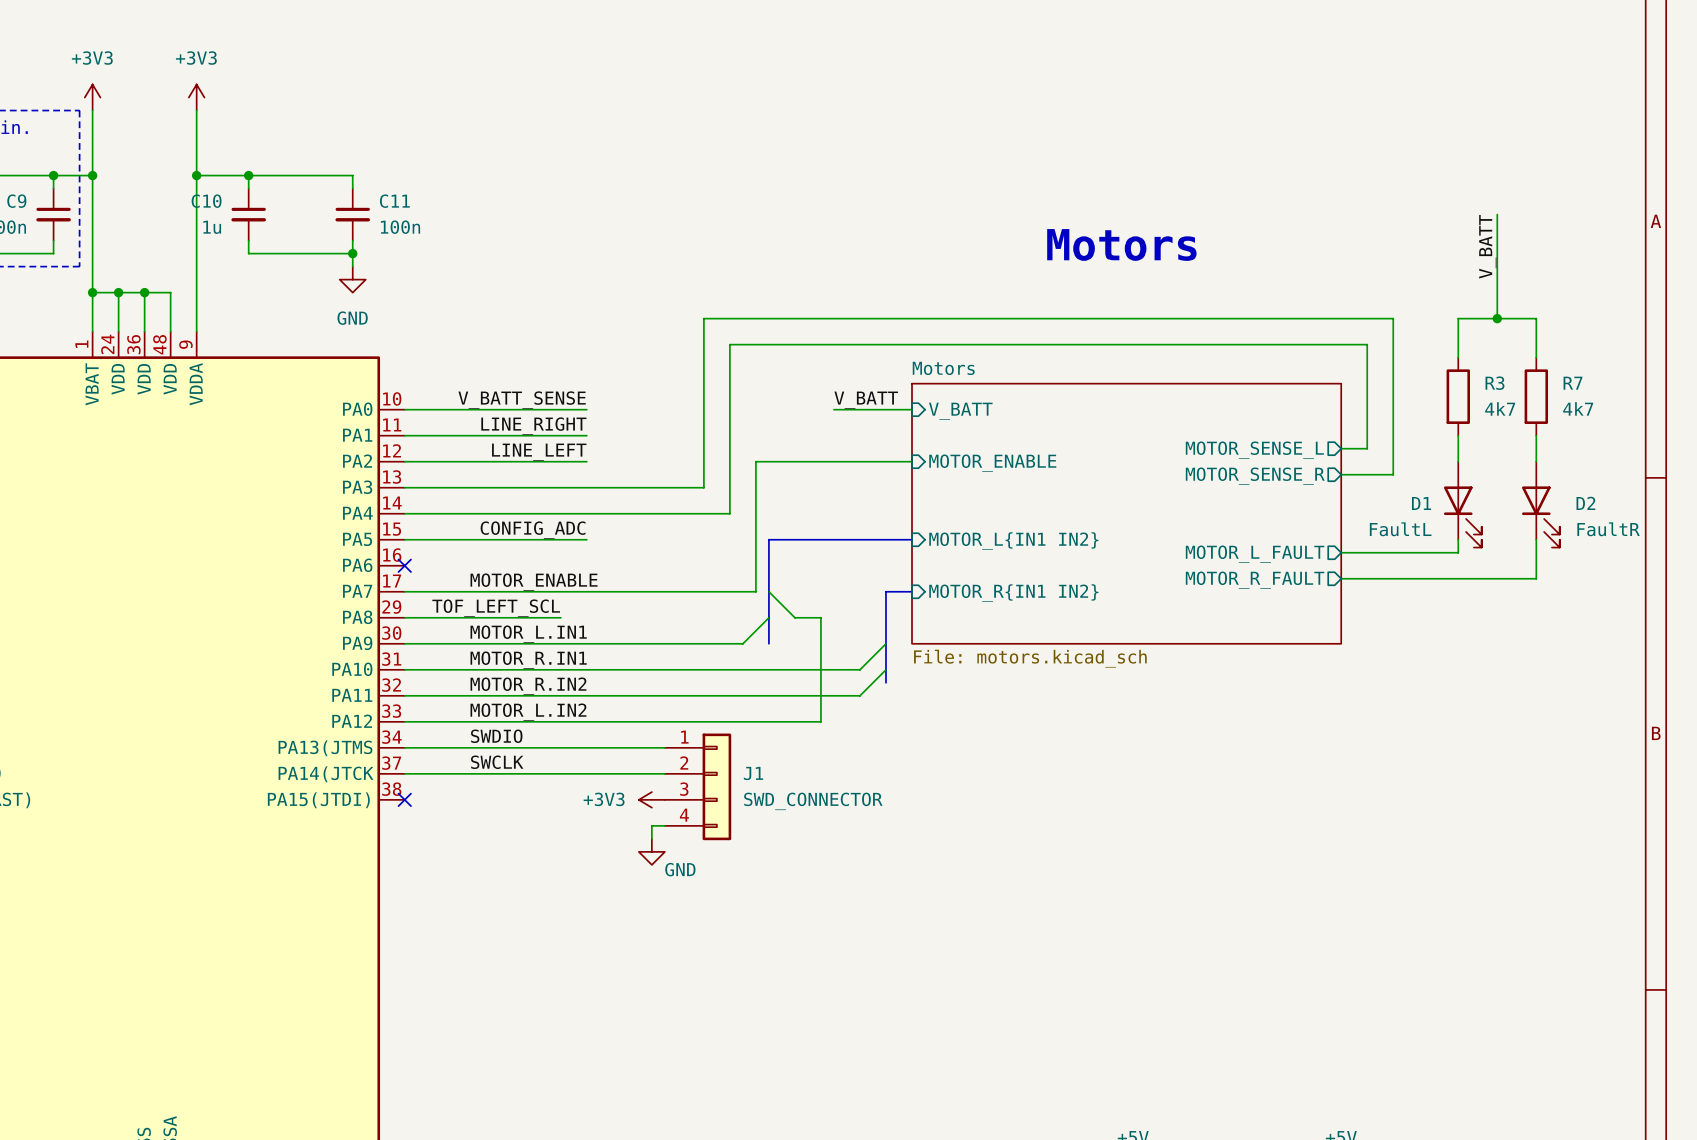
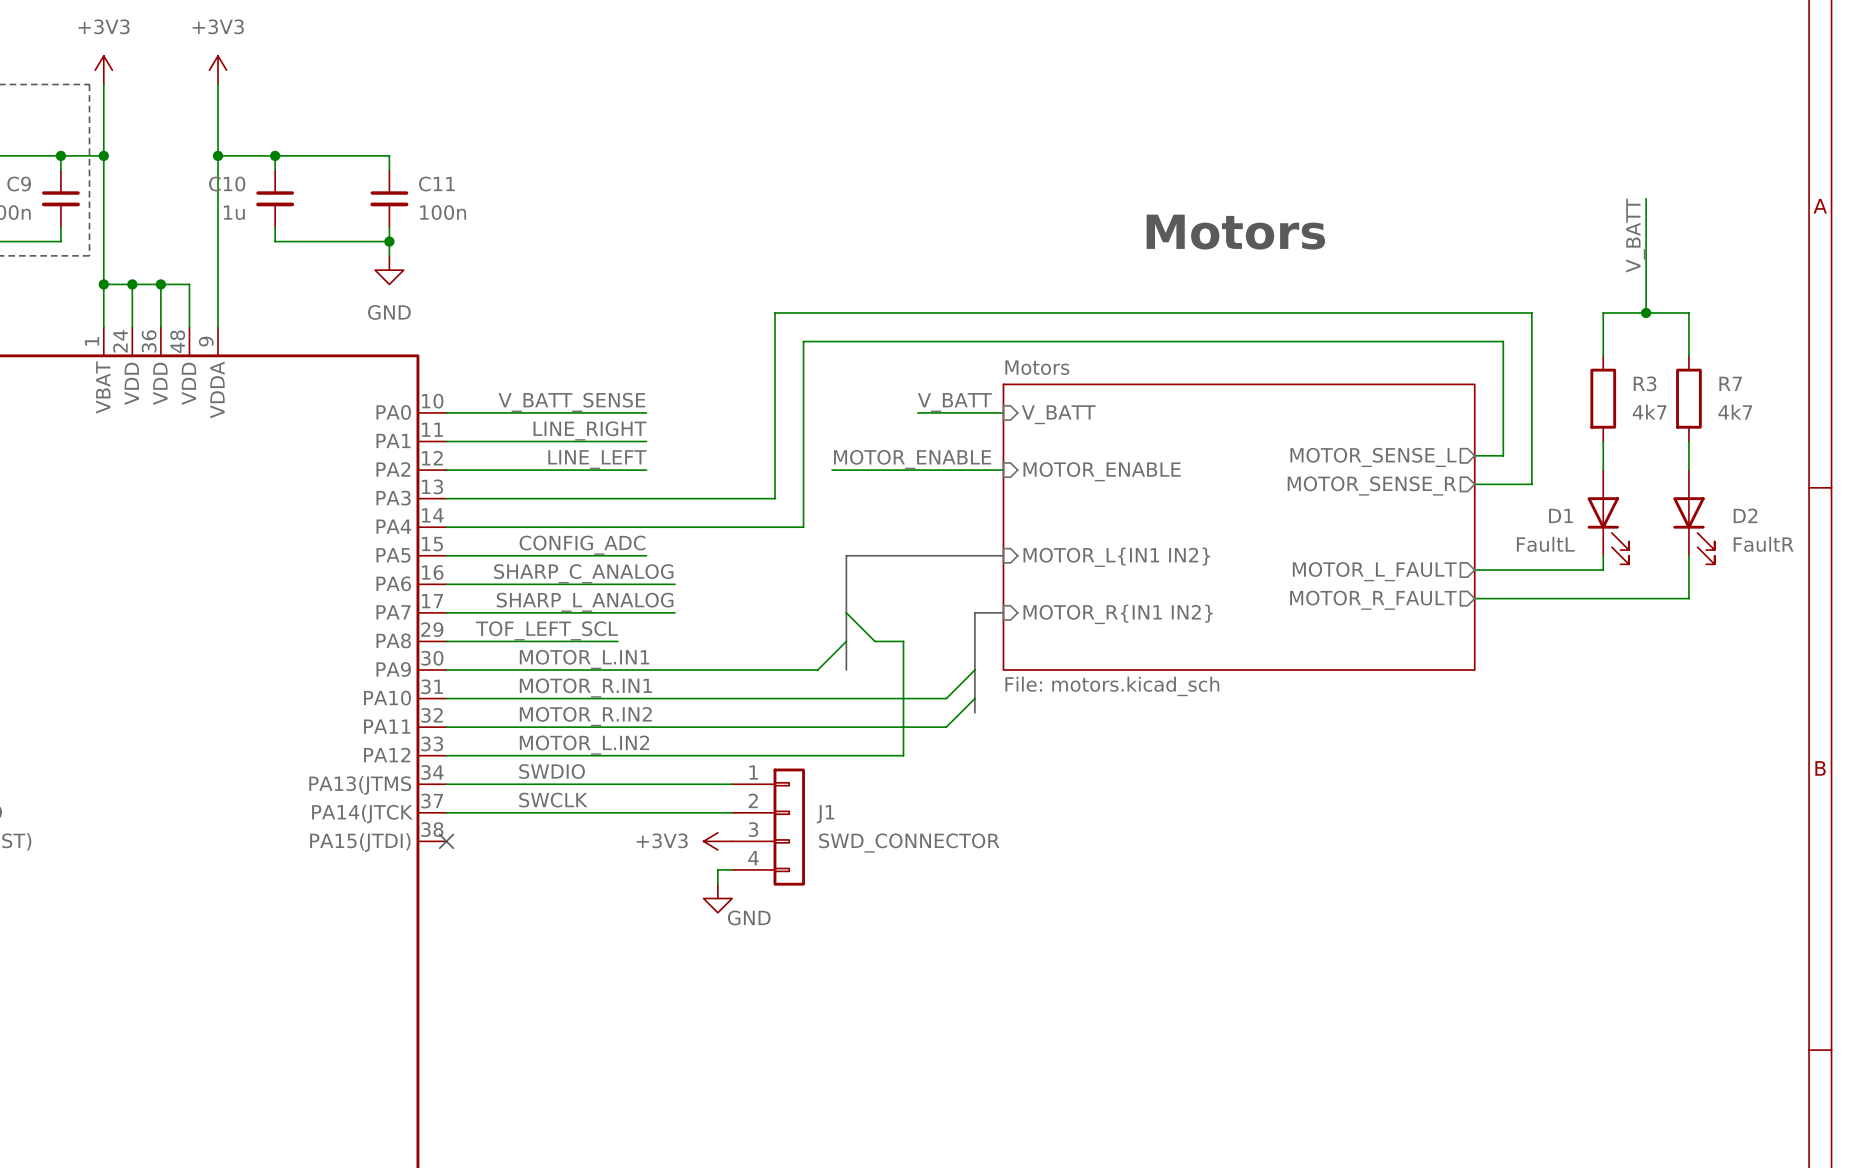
label: none -> MOTOR_ENABLE (912, 459)
wire: (755, 461) (755, 591) (612, 591) -> none
label: none -> SHARP_C_ANALOG (583, 573)
wire: none -> (446, 584) (675, 584)
no-connect mark: (404, 565) -> none
label: MOTOR_ENABLE (534, 582) -> none
label: none -> SHARP_L_ANALOG (585, 602)

